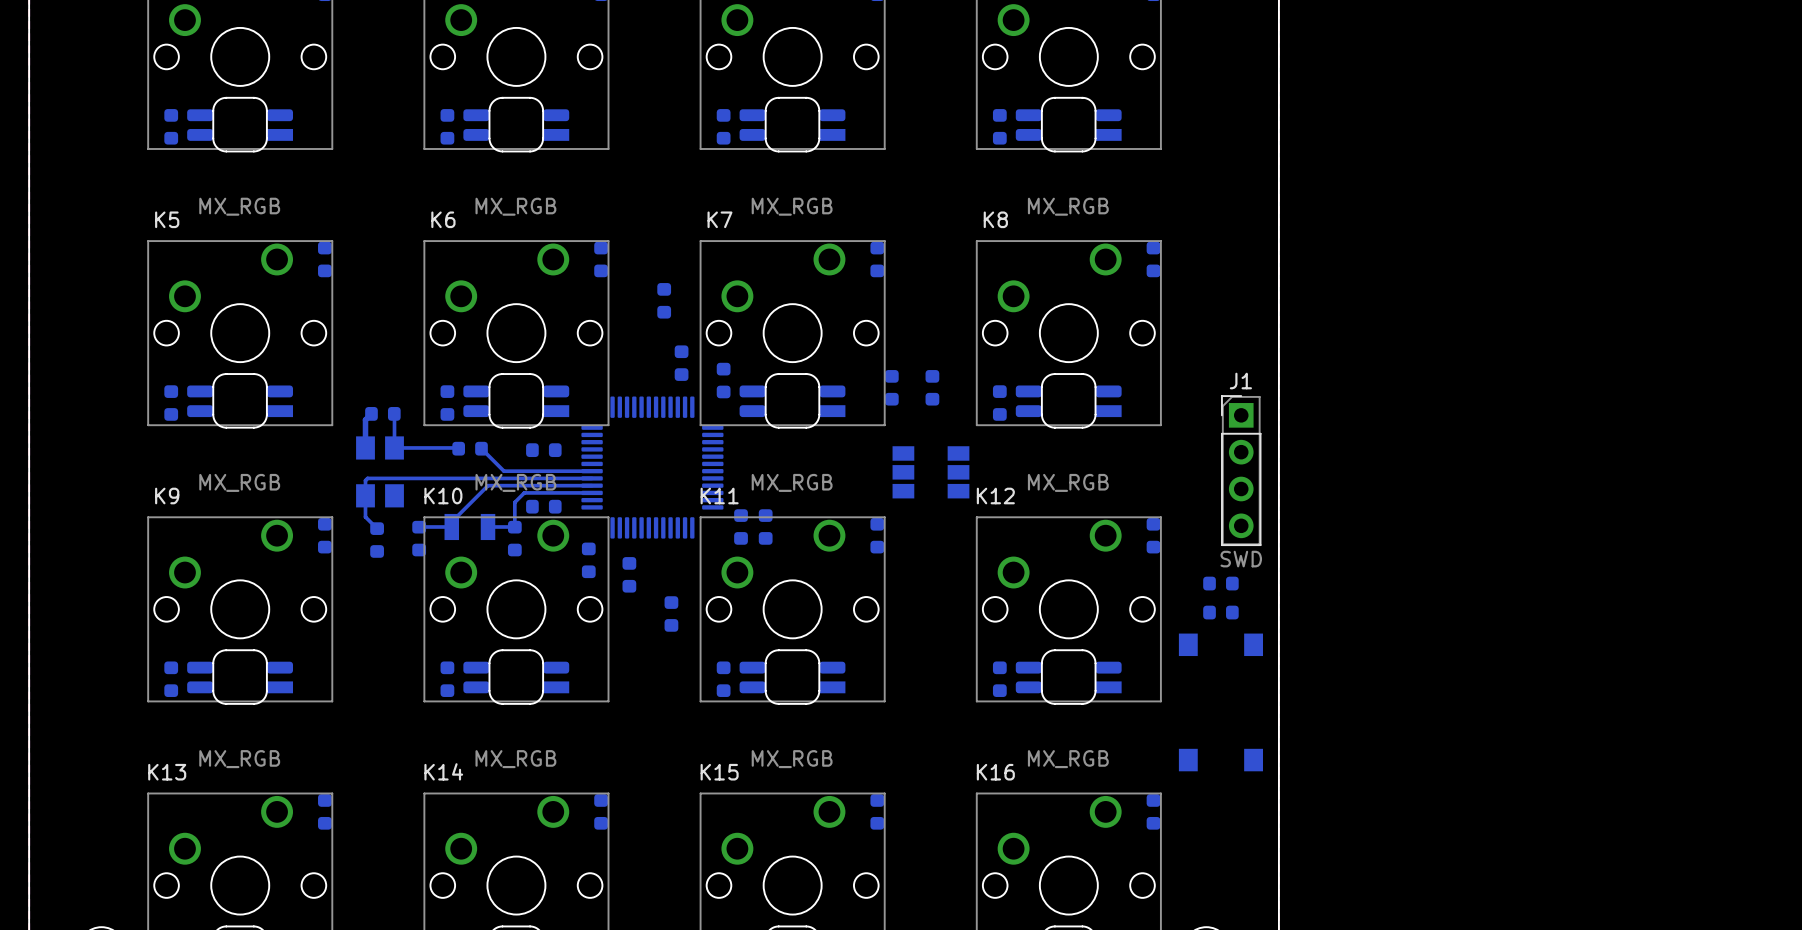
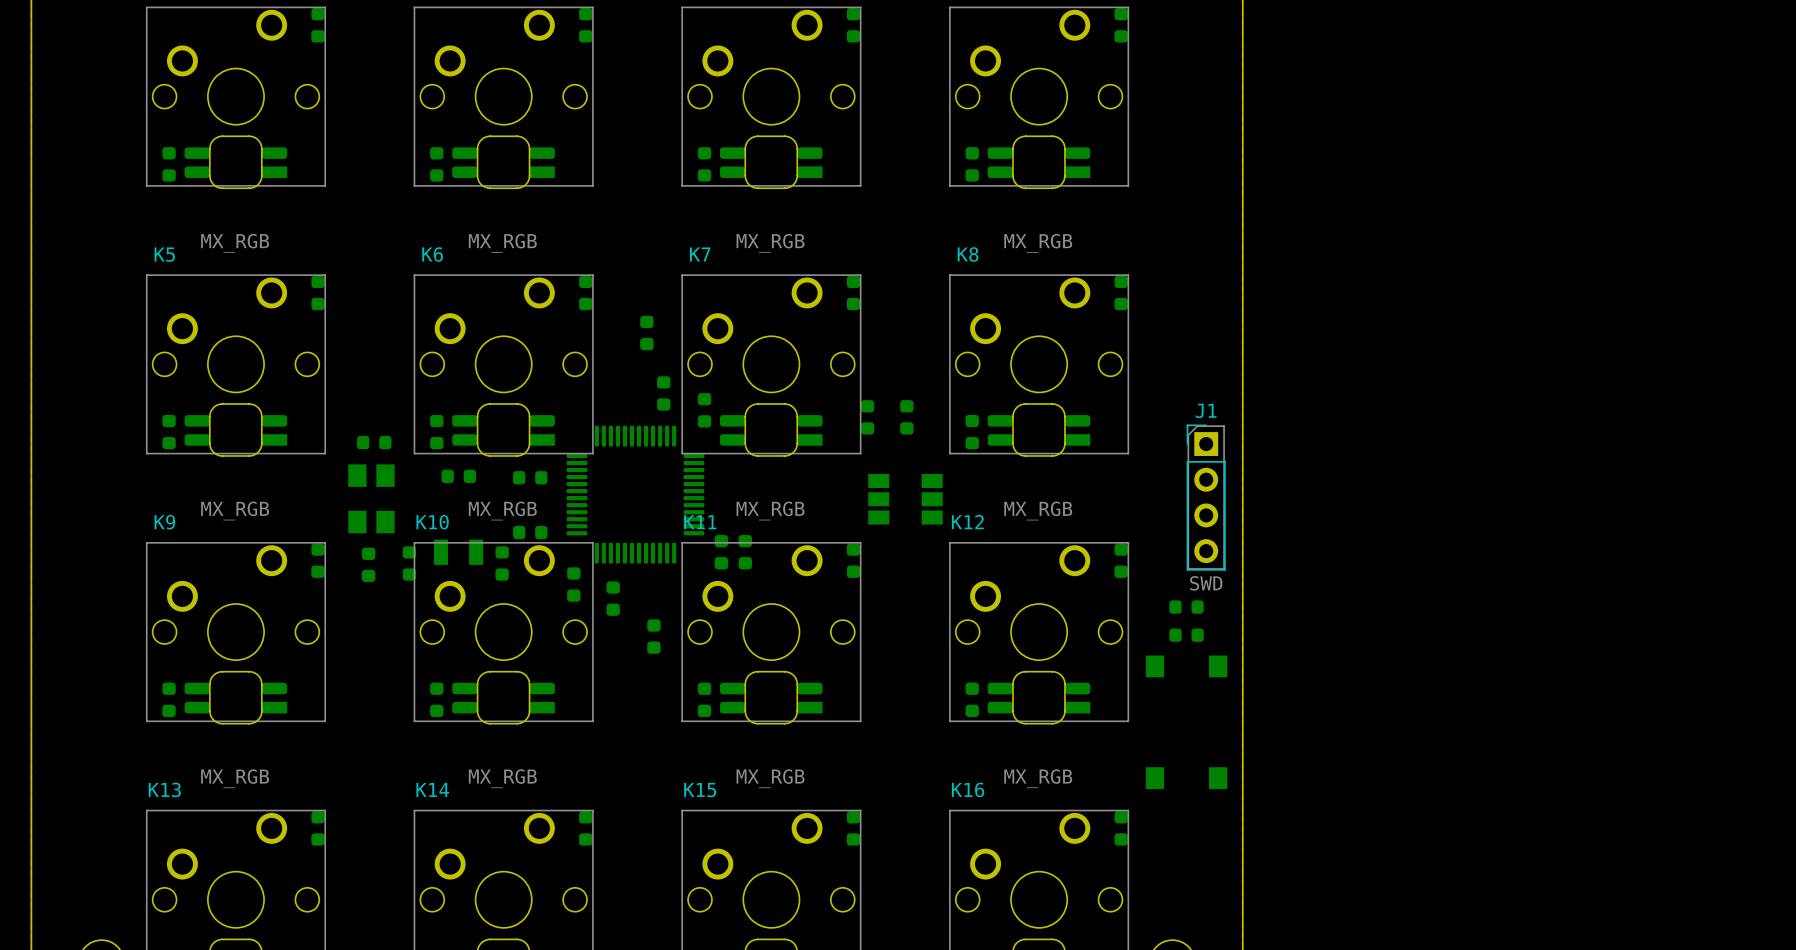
bottom track: (371, 413) (365, 419) (365, 447) -> none
bottom track: (394, 414) (394, 447) (458, 448) -> none
bottom track: (481, 448) (503, 471) (592, 471) -> none
bottom track: (592, 478) (367, 478) (365, 480) (365, 517) (377, 528) -> none
bottom track: (592, 485) (488, 485) (451, 521) (451, 526) (419, 526) -> none
bottom track: (592, 492) (524, 492) (514, 502) (514, 527) -> none
bottom track: (488, 526) (514, 526) -> none

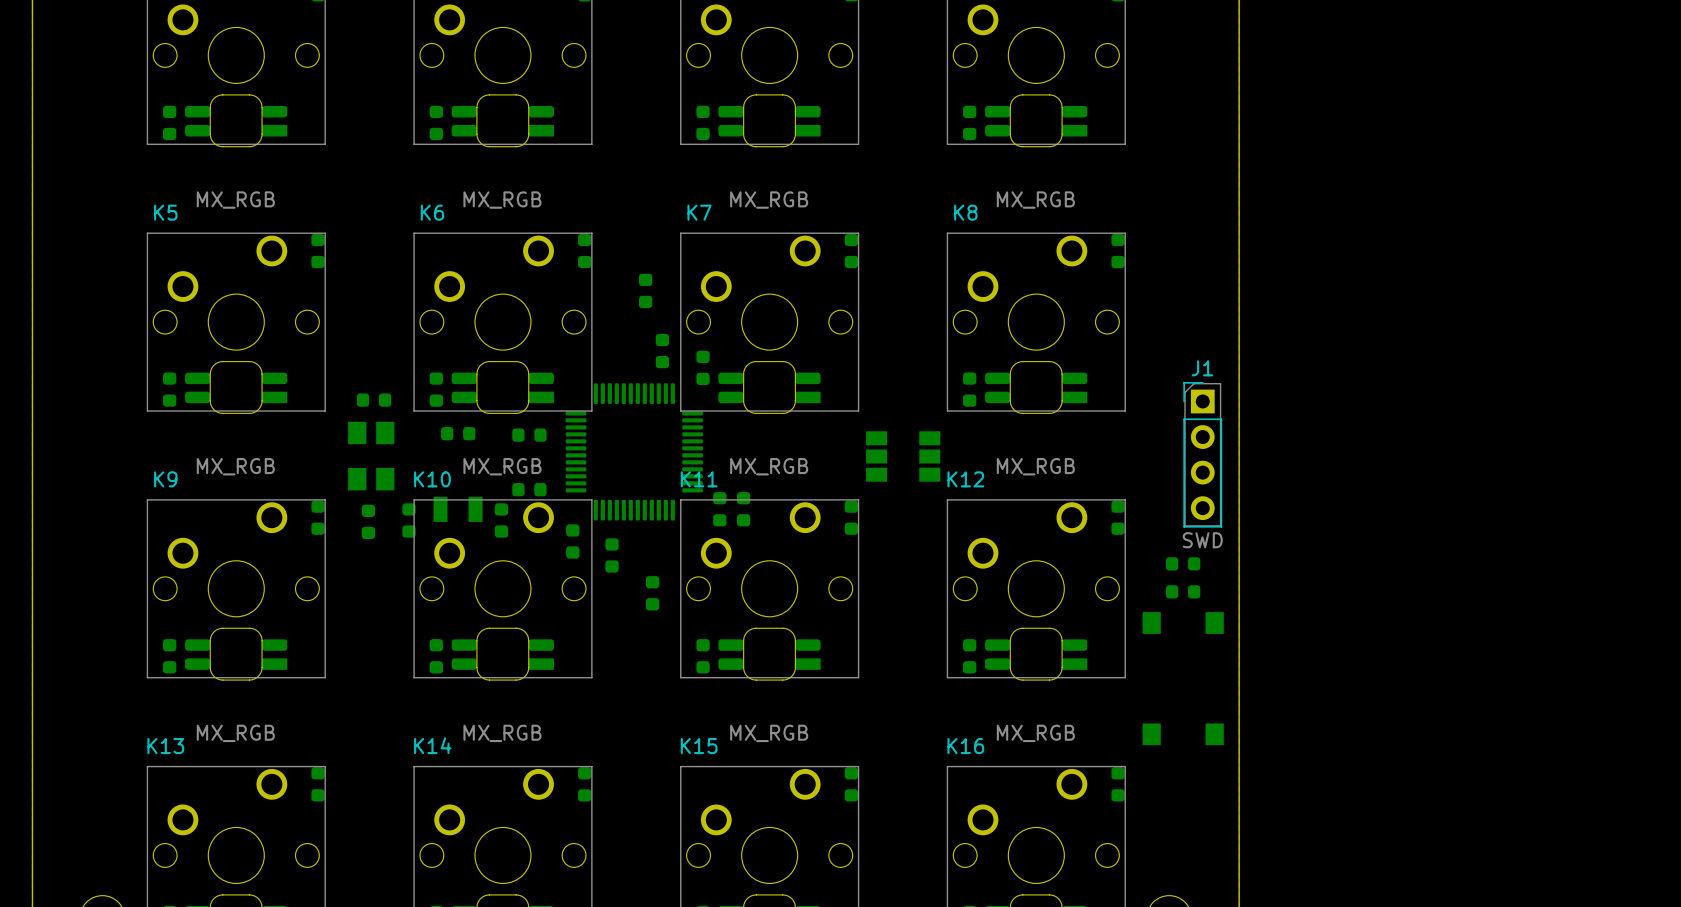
part: (867, 417) -> none
part: (906, 417) -> none

